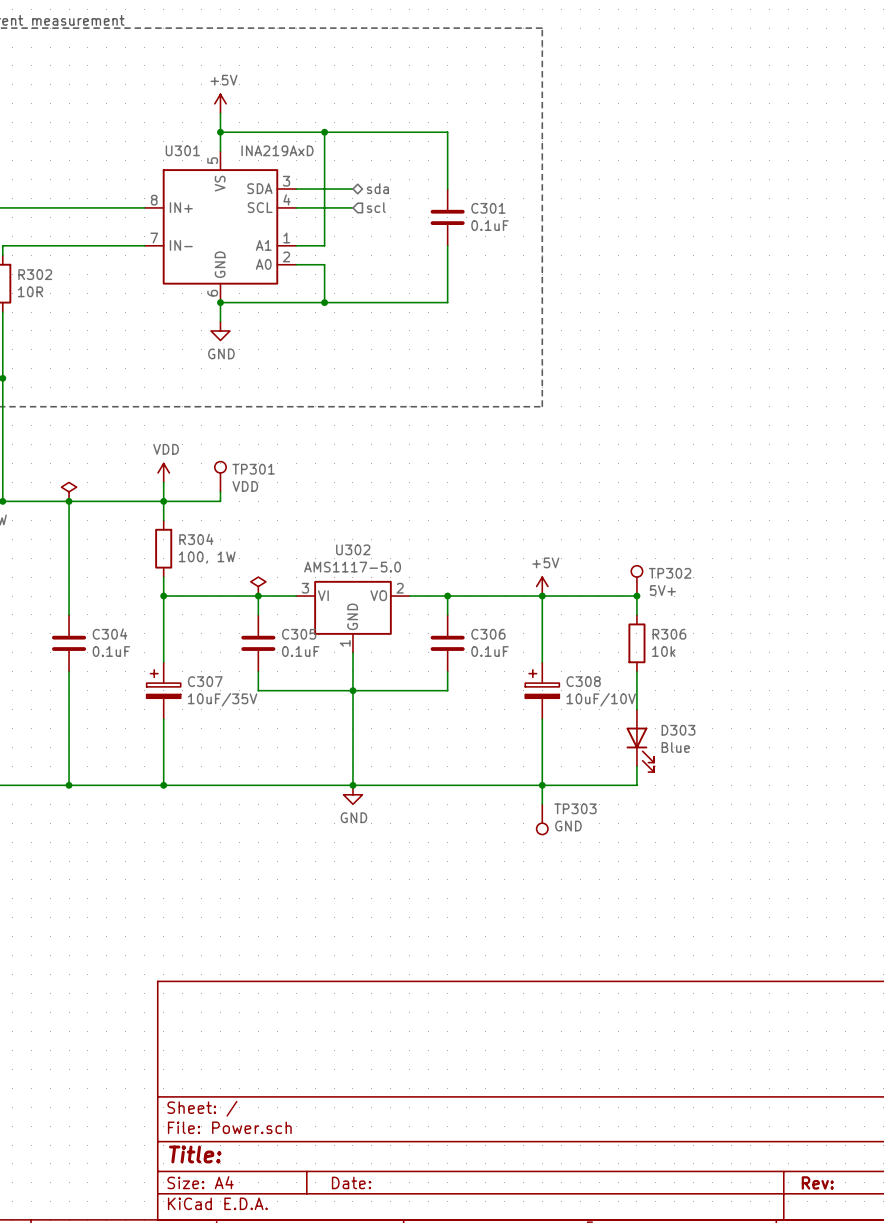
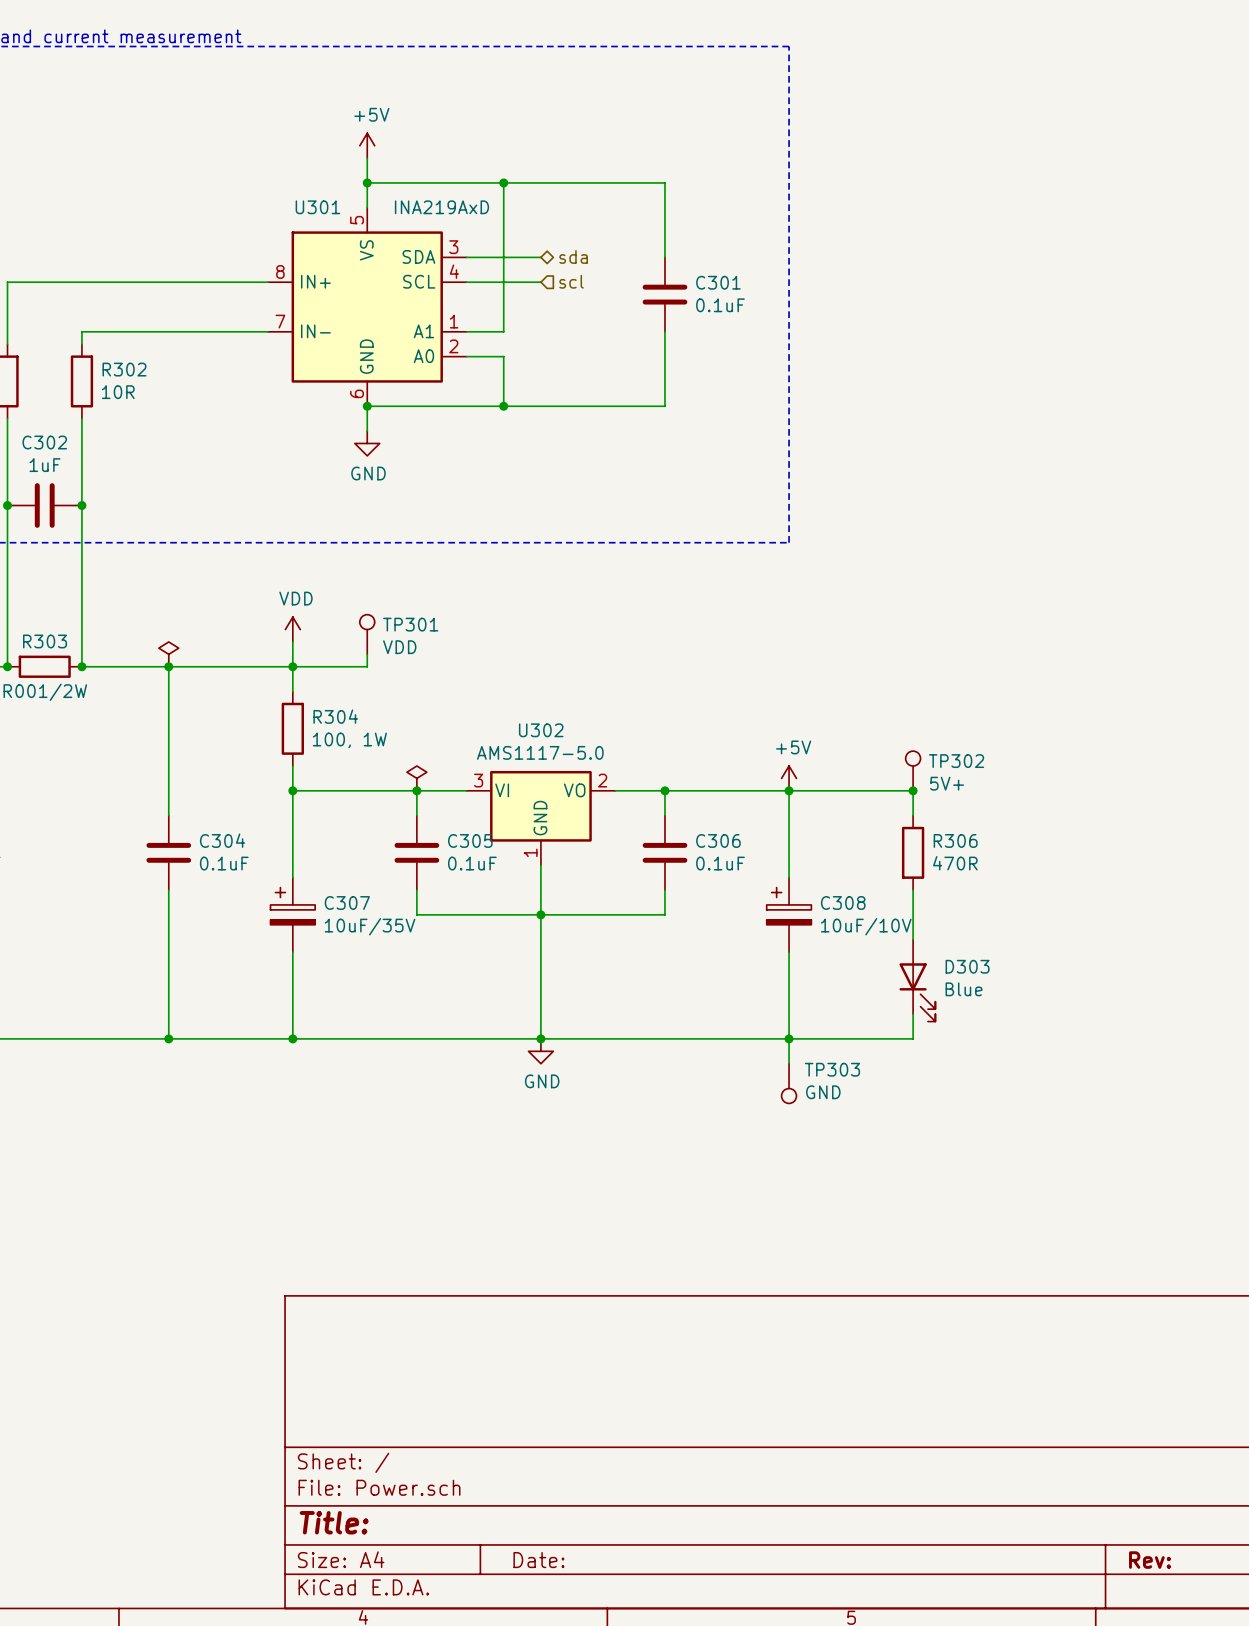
R306 value: 10k (663, 651) -> 470R (955, 863)

